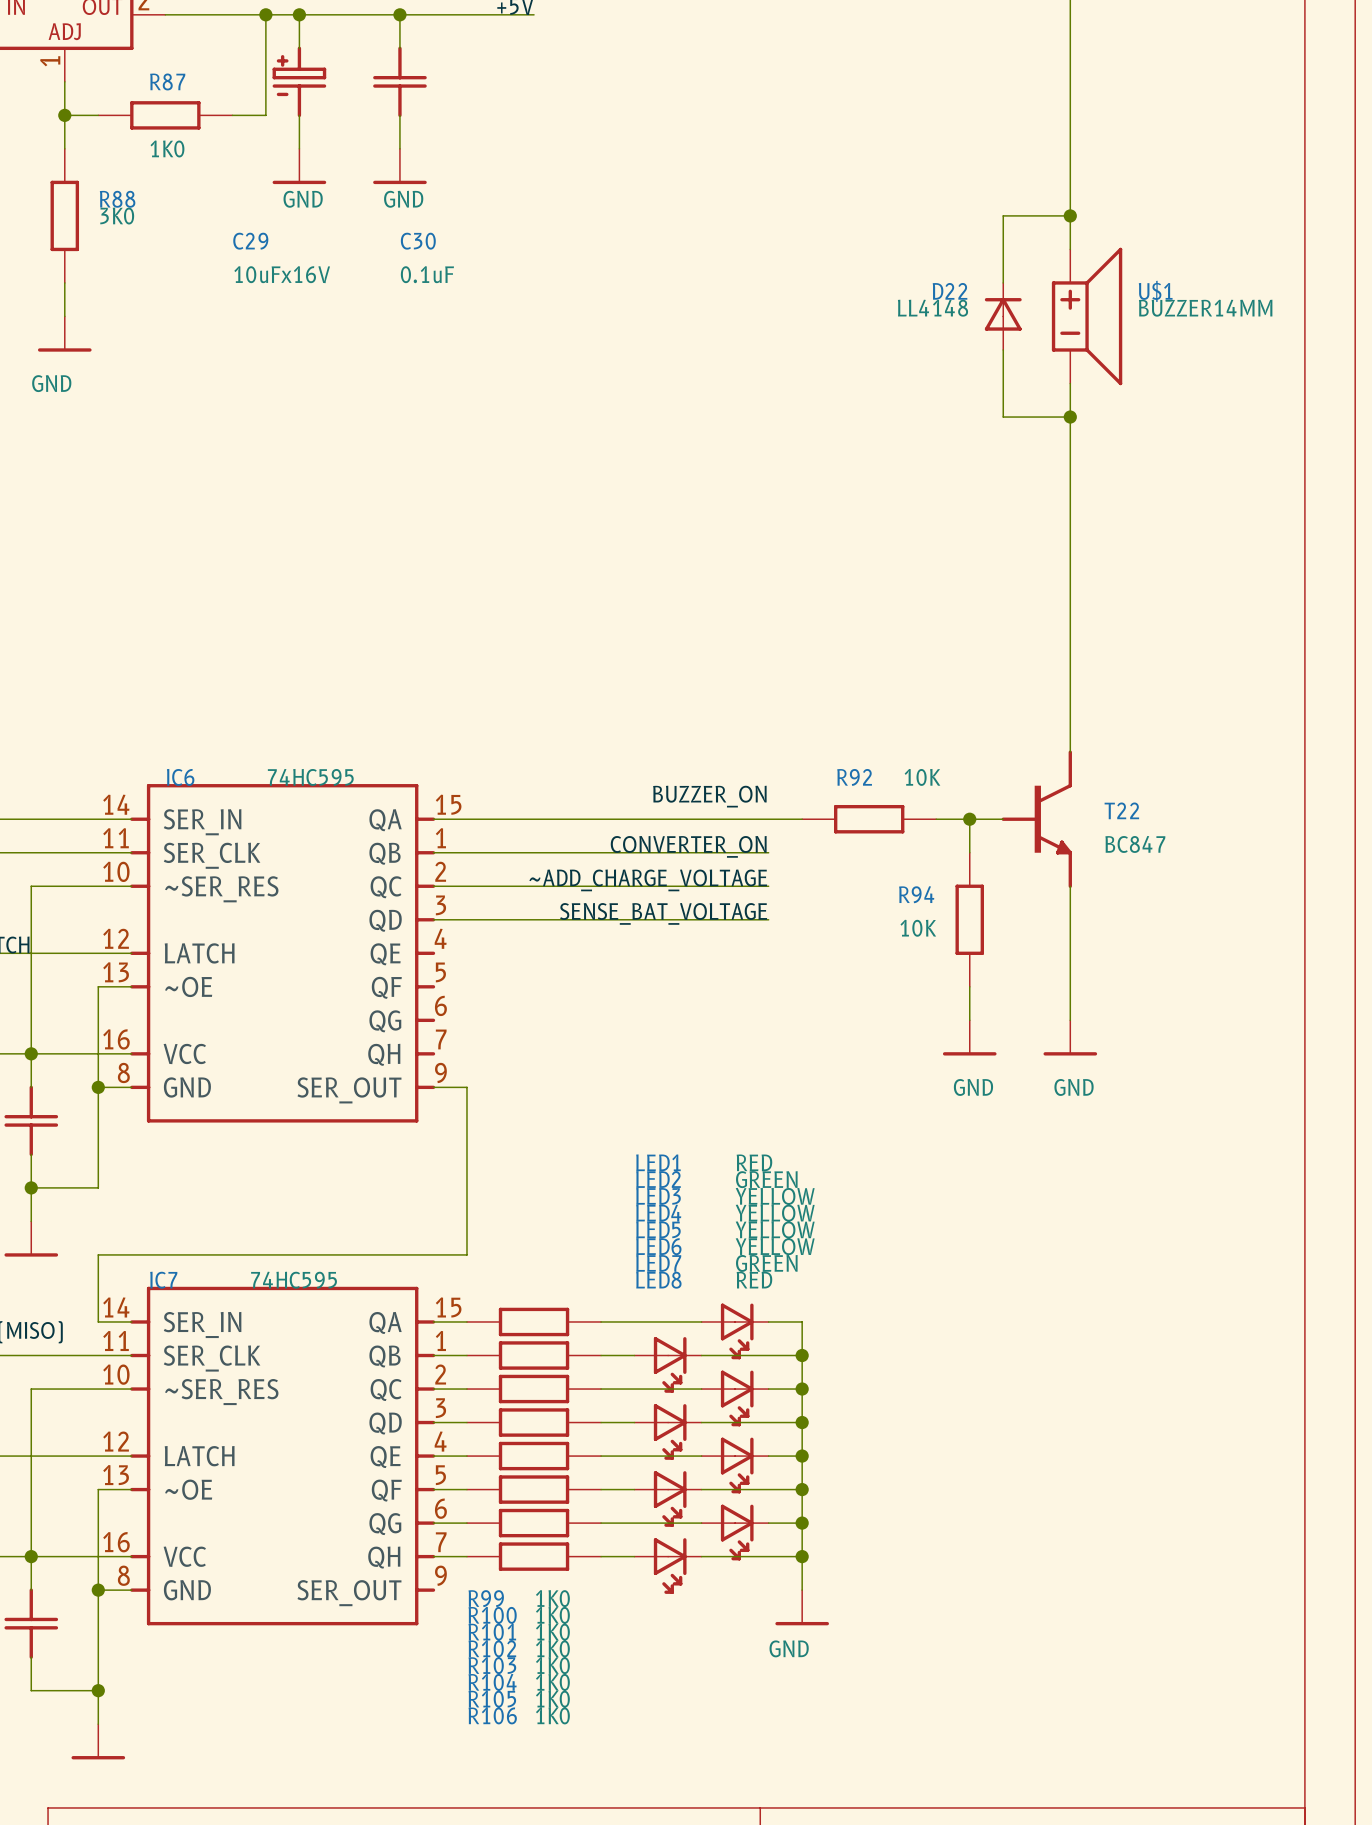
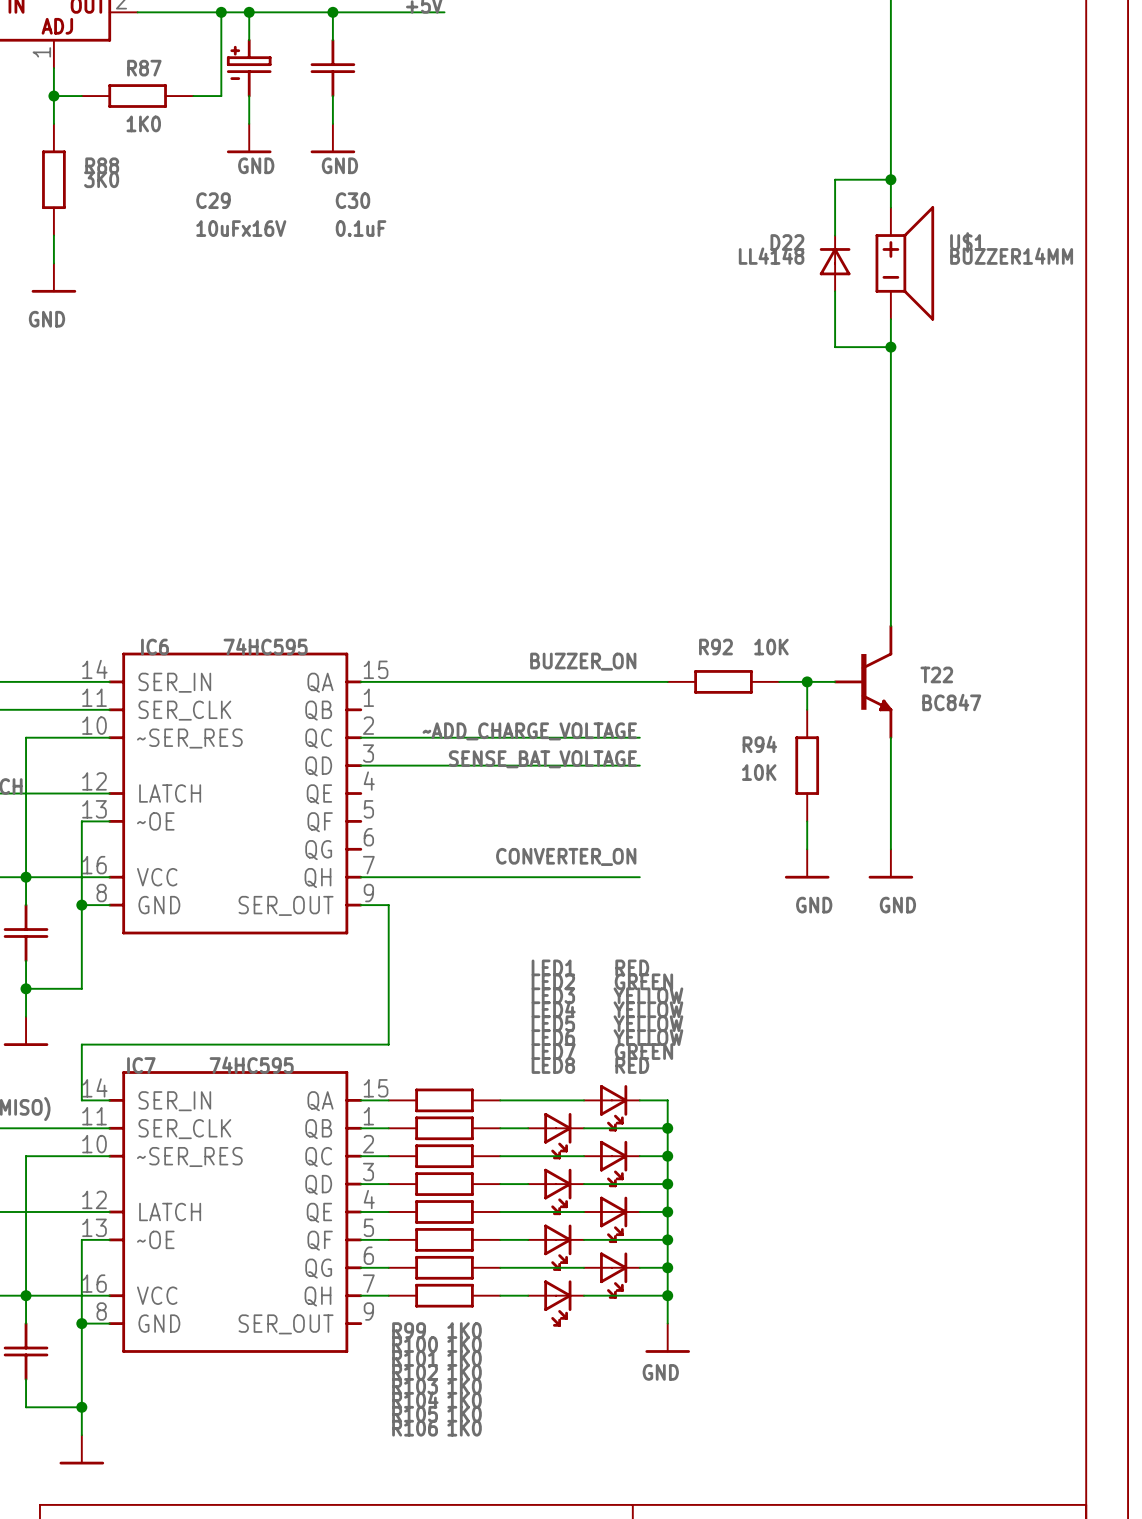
label position: CONVERTER_ON (688, 846) -> CONVERTER_ON (566, 856)
wire: (433, 852) (768, 852) -> (360, 877) (639, 877)

